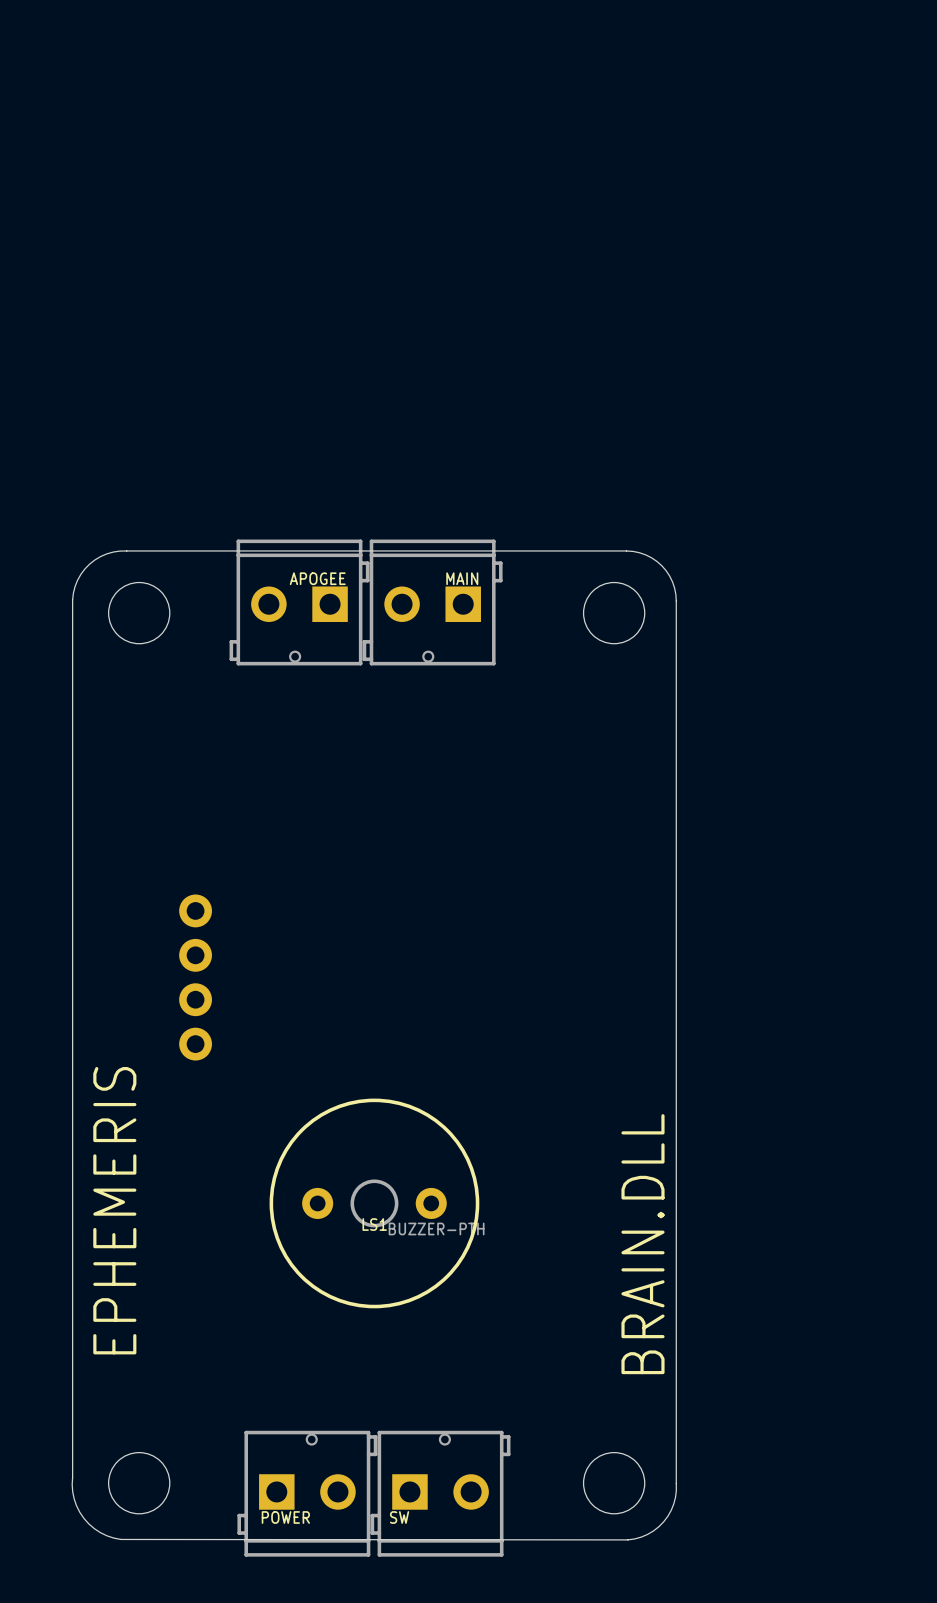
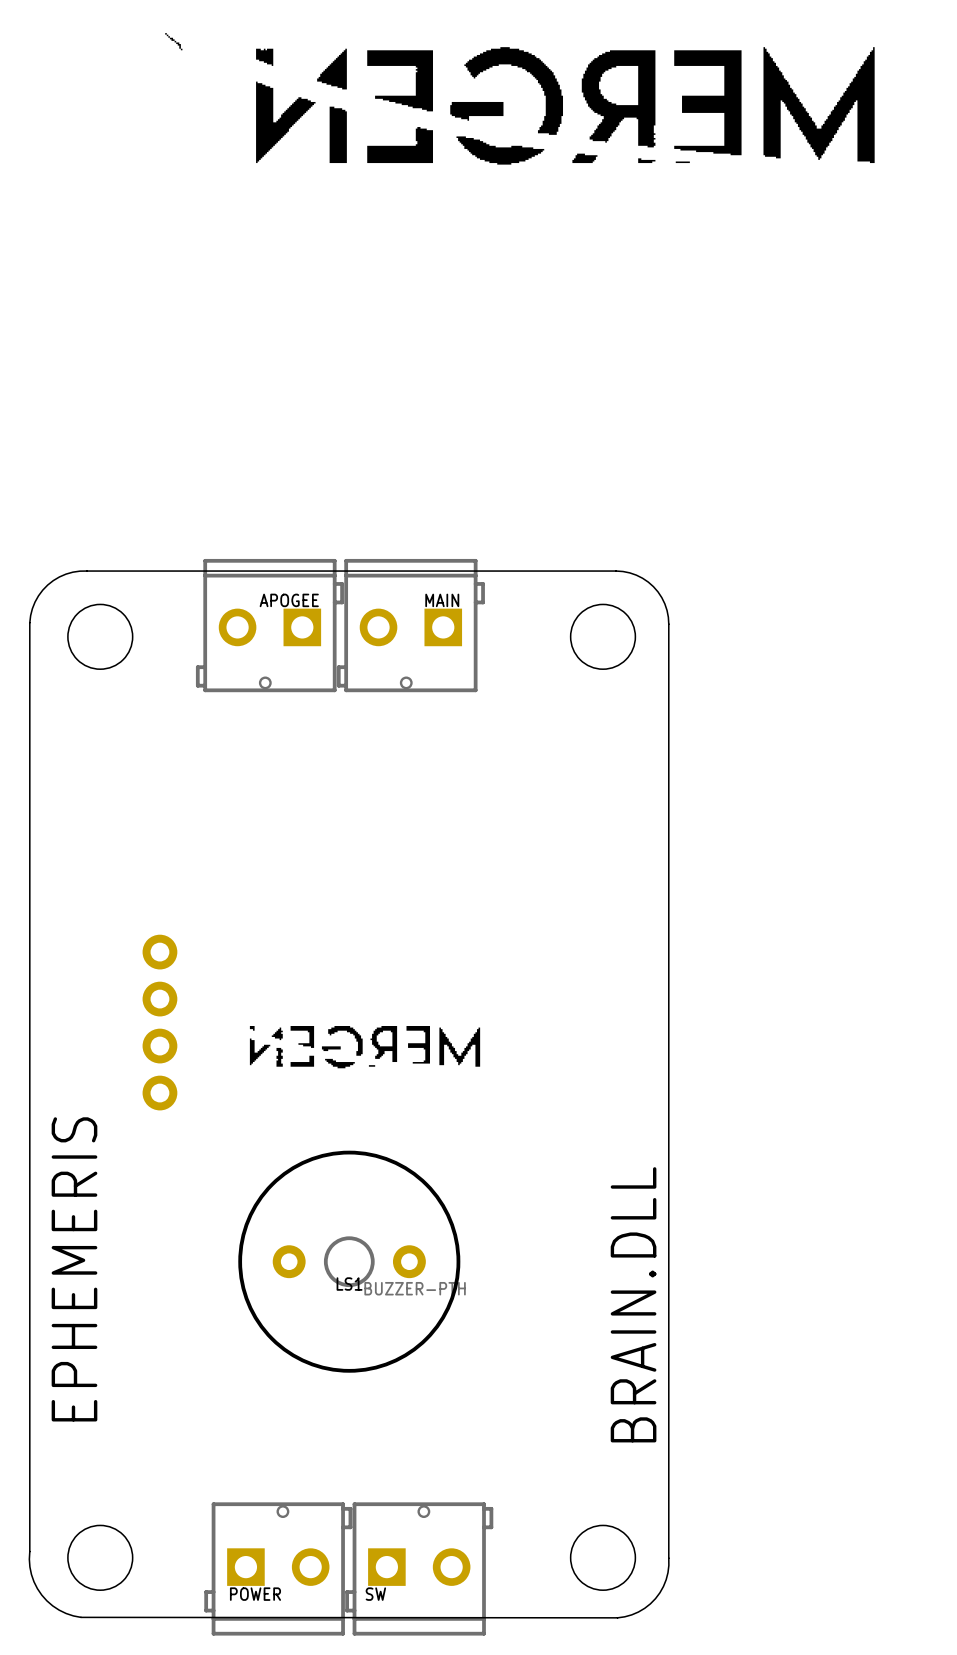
drawing: none -> [165, 33, 183, 51]
drawing: none -> [256, 47, 875, 165]
drawing: none -> [249, 1026, 481, 1069]

